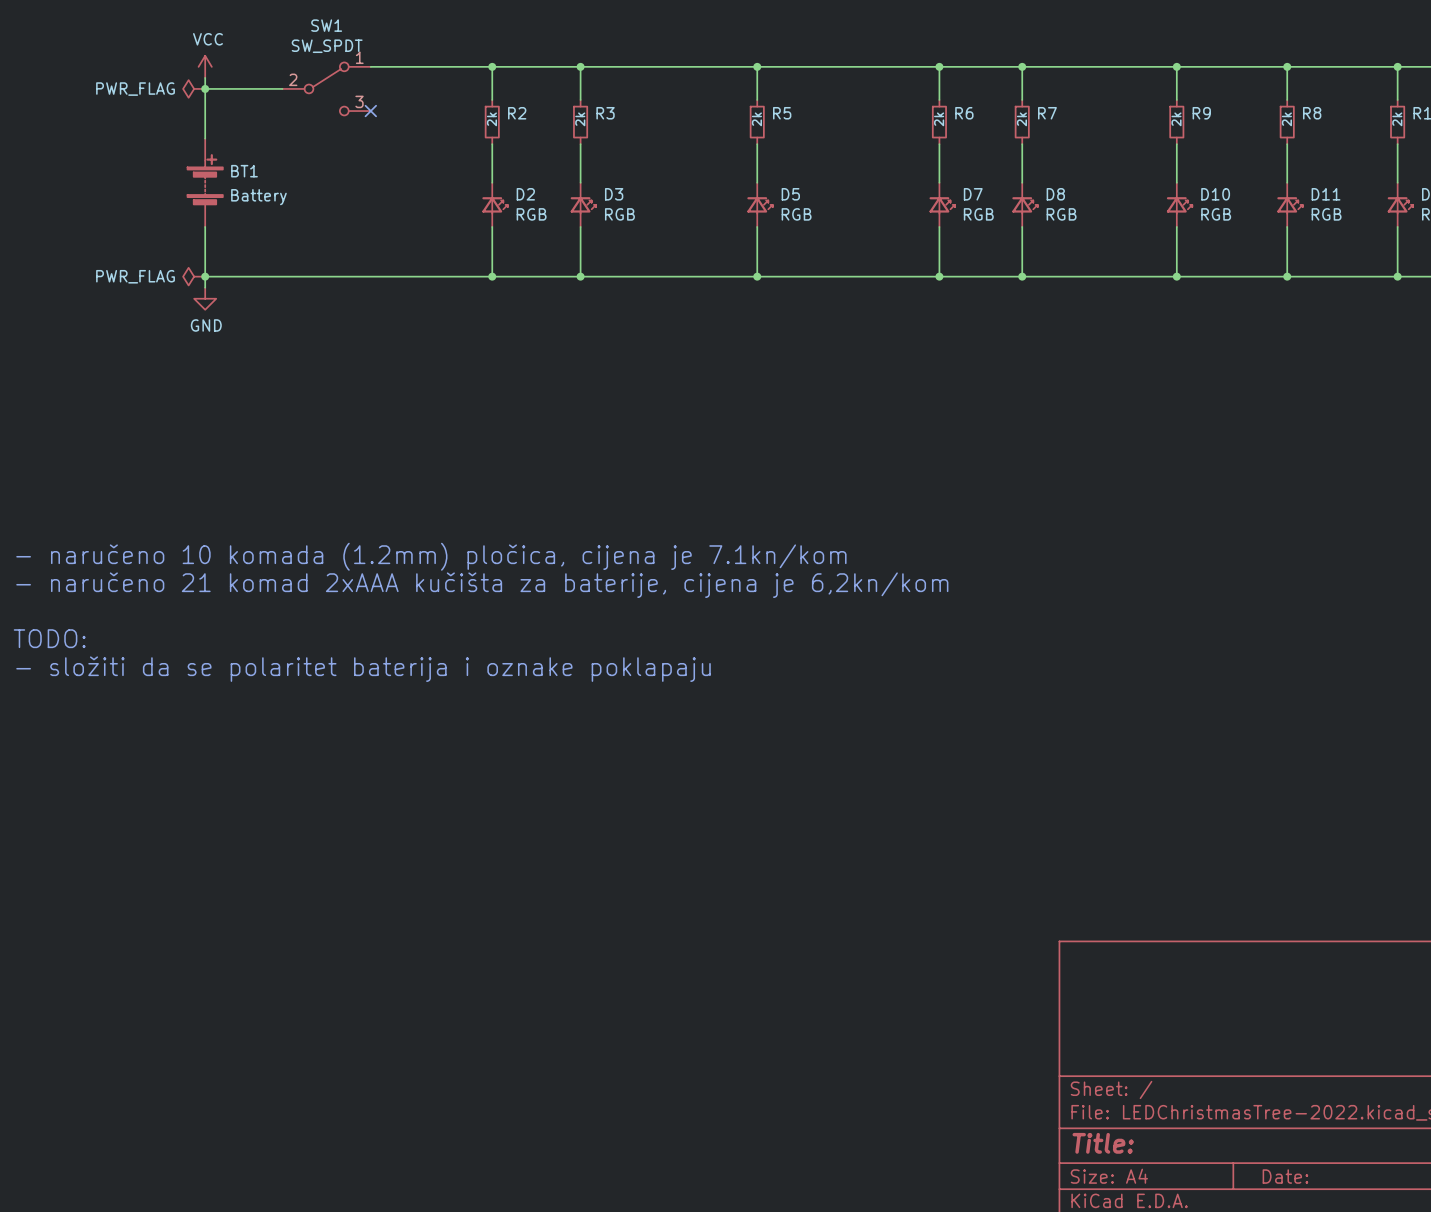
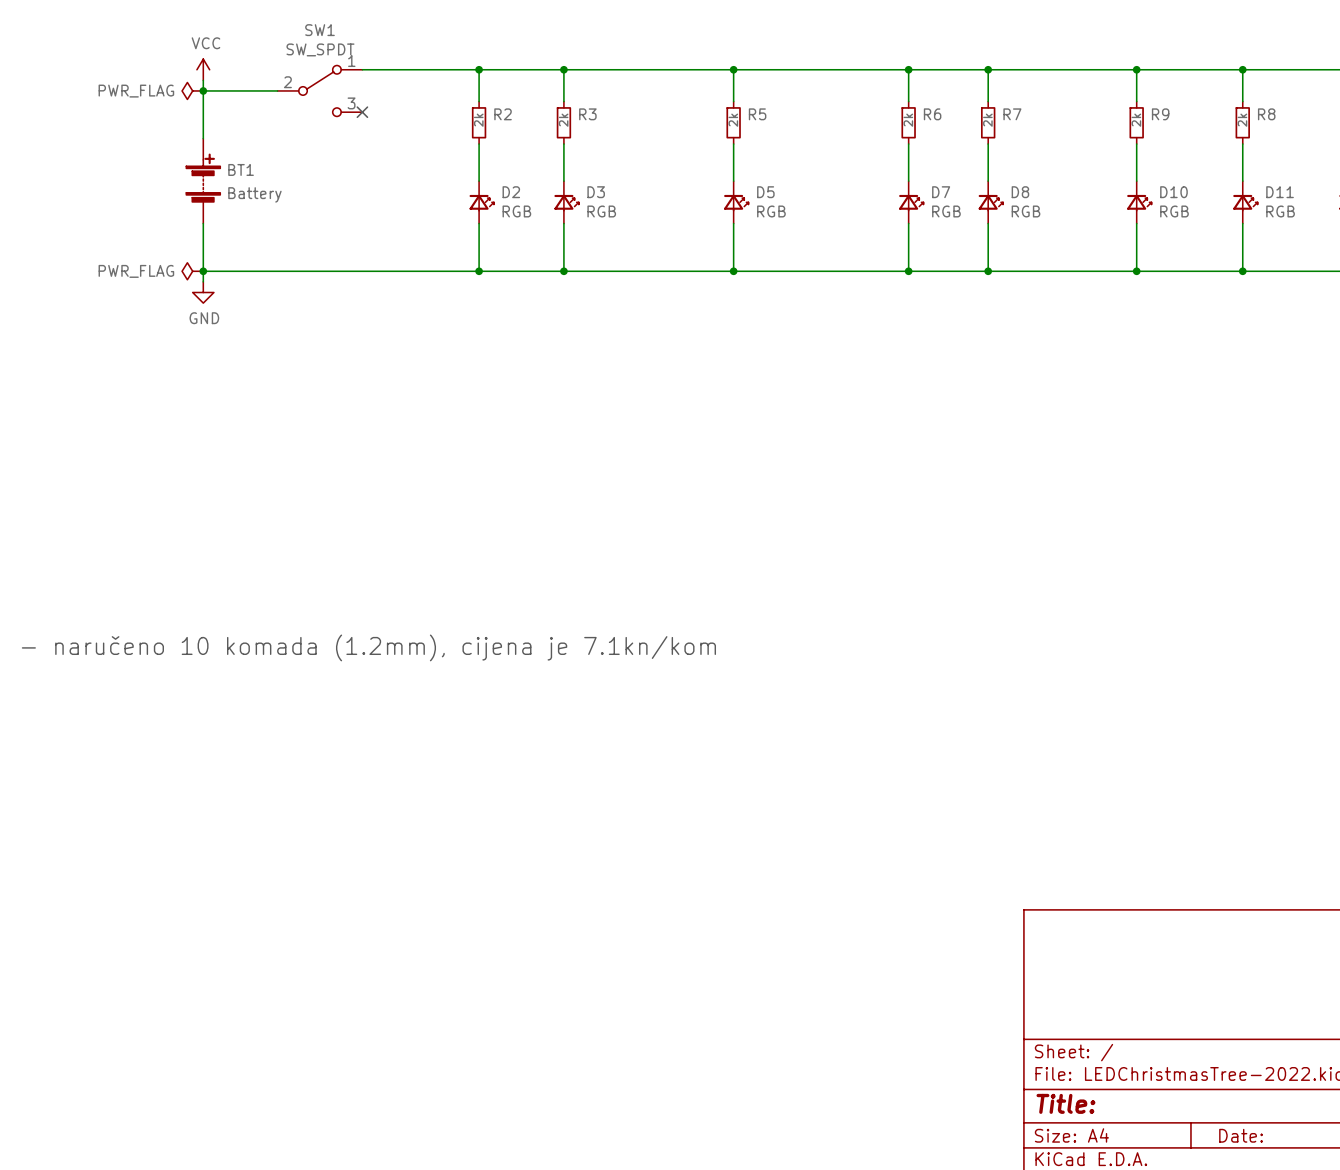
text: - naručeno 10 komada (1.2mm) pločica, cijena je 7.1kn/kom (431, 556) -> none
text: - naručeno 21 komad 2xAAA kučišta za baterije, cijena je 6,2kn/kom (482, 585) -> none
text: TODO: (49, 638) -> none
text: - složiti da se polaritet baterija i oznake poklapaju (363, 669) -> - naručeno 10 komada (1.2mm), cijena je 7.1kn/kom (368, 647)

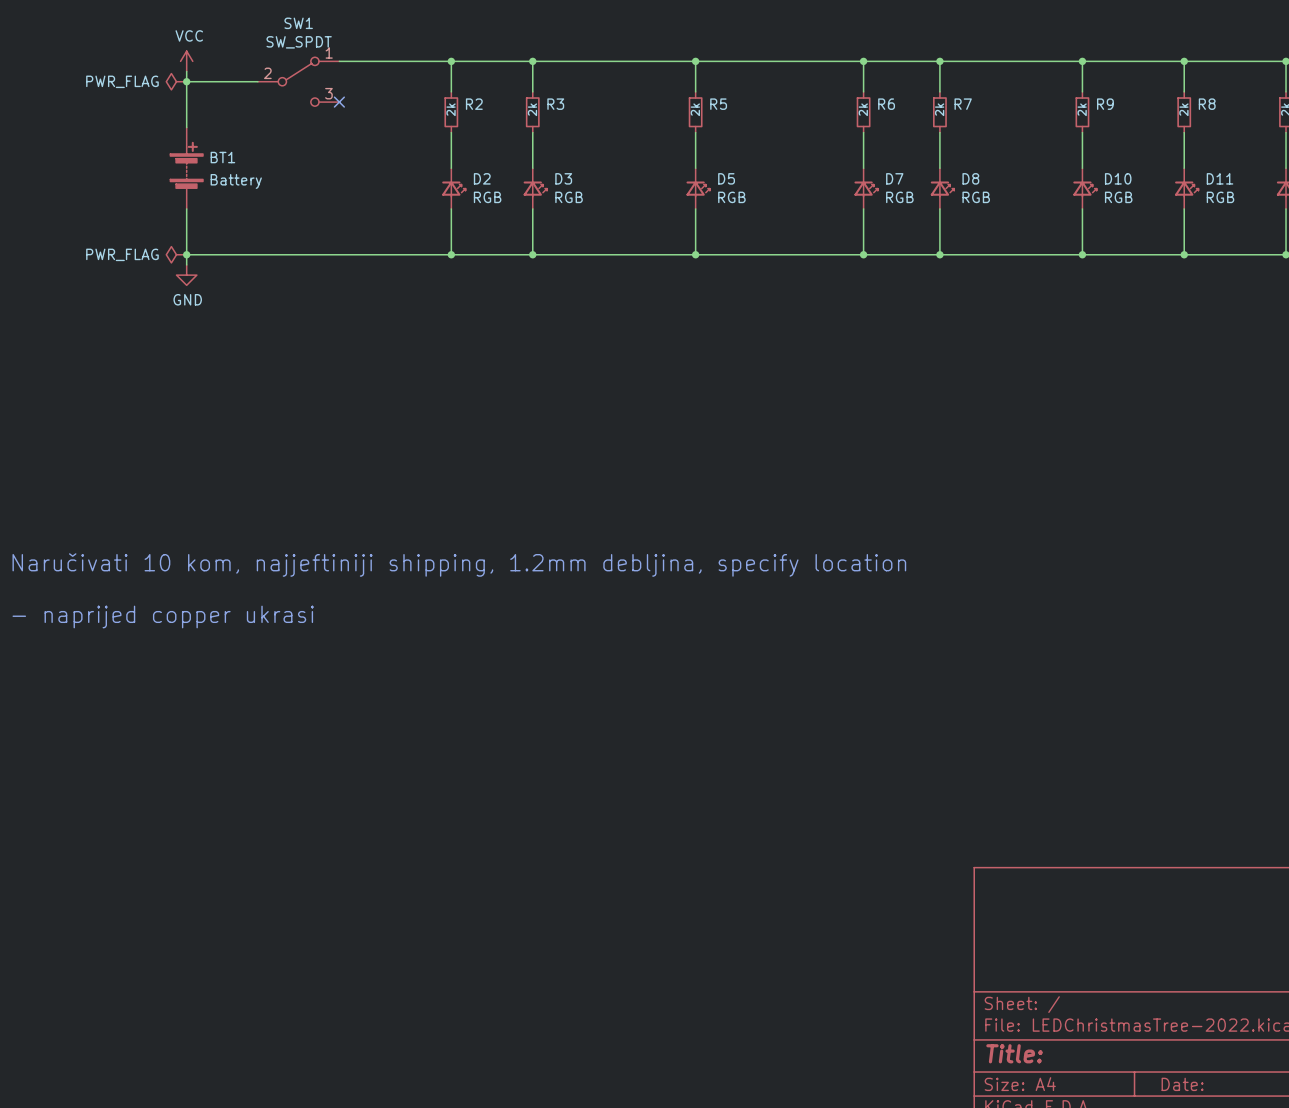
text: none -> Naručivati 10 kom, najjeftiniji shipping, 1.2mm debljina, specify location (459, 564)
text: - naručeno 10 komada (1.2mm), cijena je 7.1kn/kom (368, 647) -> - naprijed copper ukrasi (163, 616)

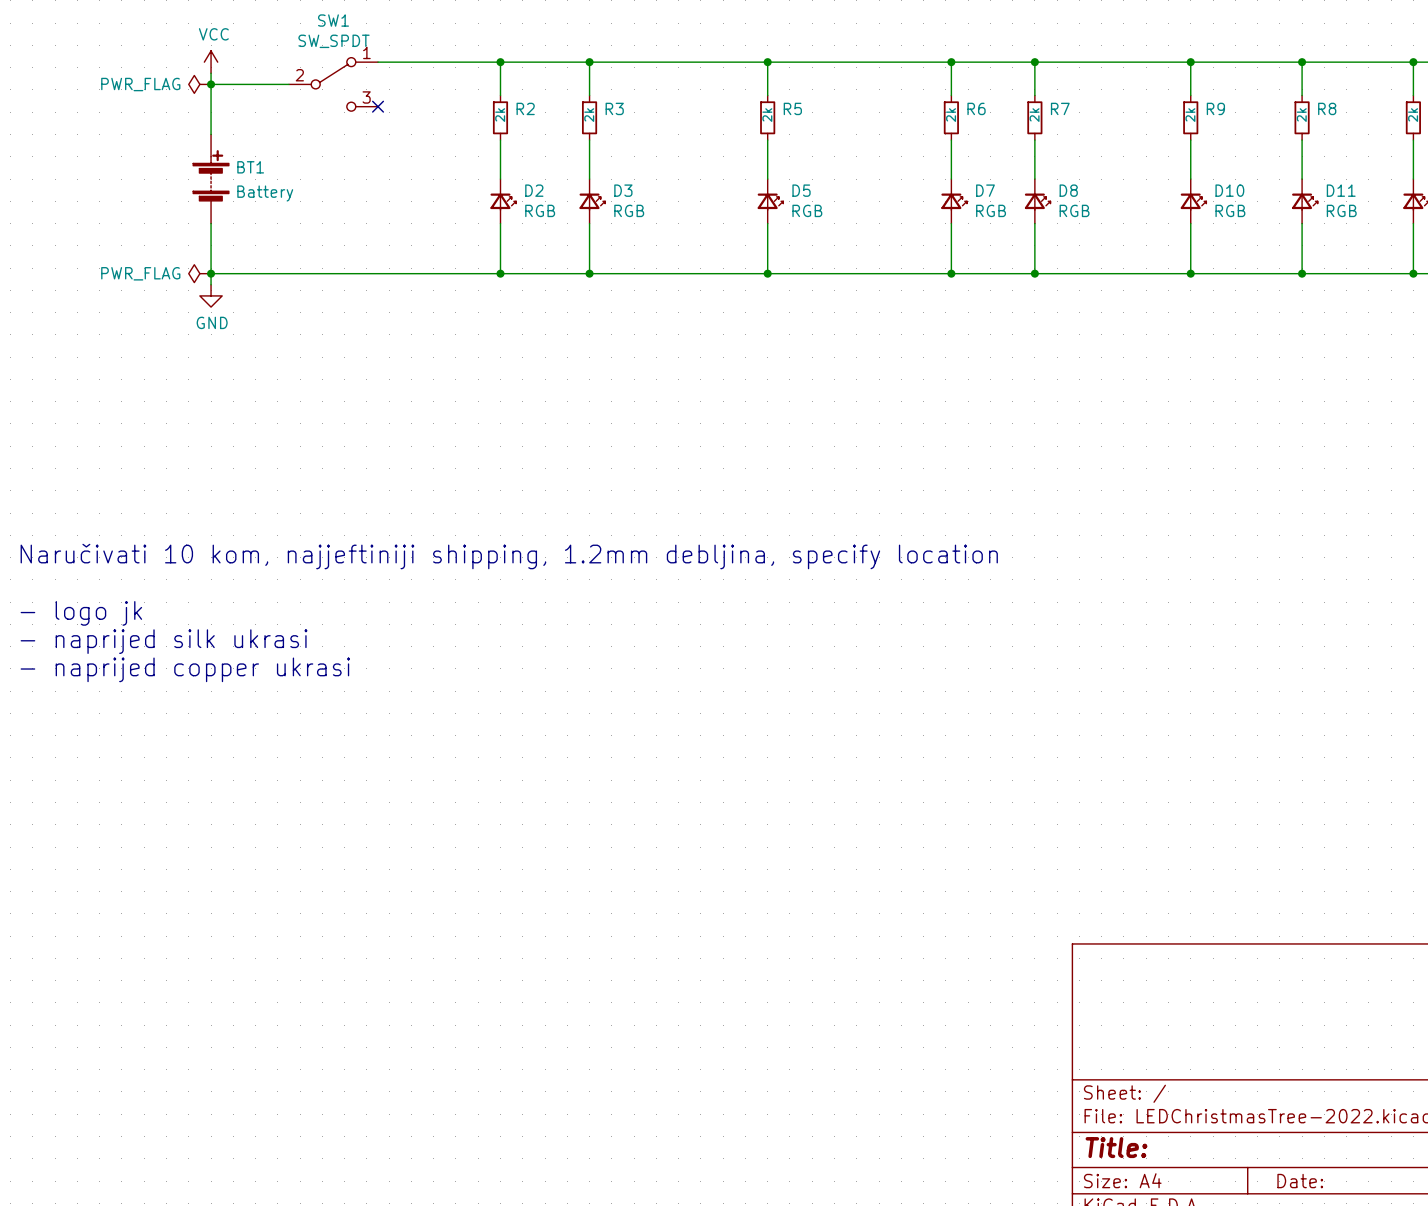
text: none -> Naručivati 10 kom, najjeftiniji shipping, 1.2mm debljina, specify location (509, 556)
text: Naručivati 10 kom, najjeftiniji shipping, 1.2mm debljina, specify location (459, 564) -> - logo jk (81, 613)
text: none -> - naprijed silk ukrasi (164, 641)

